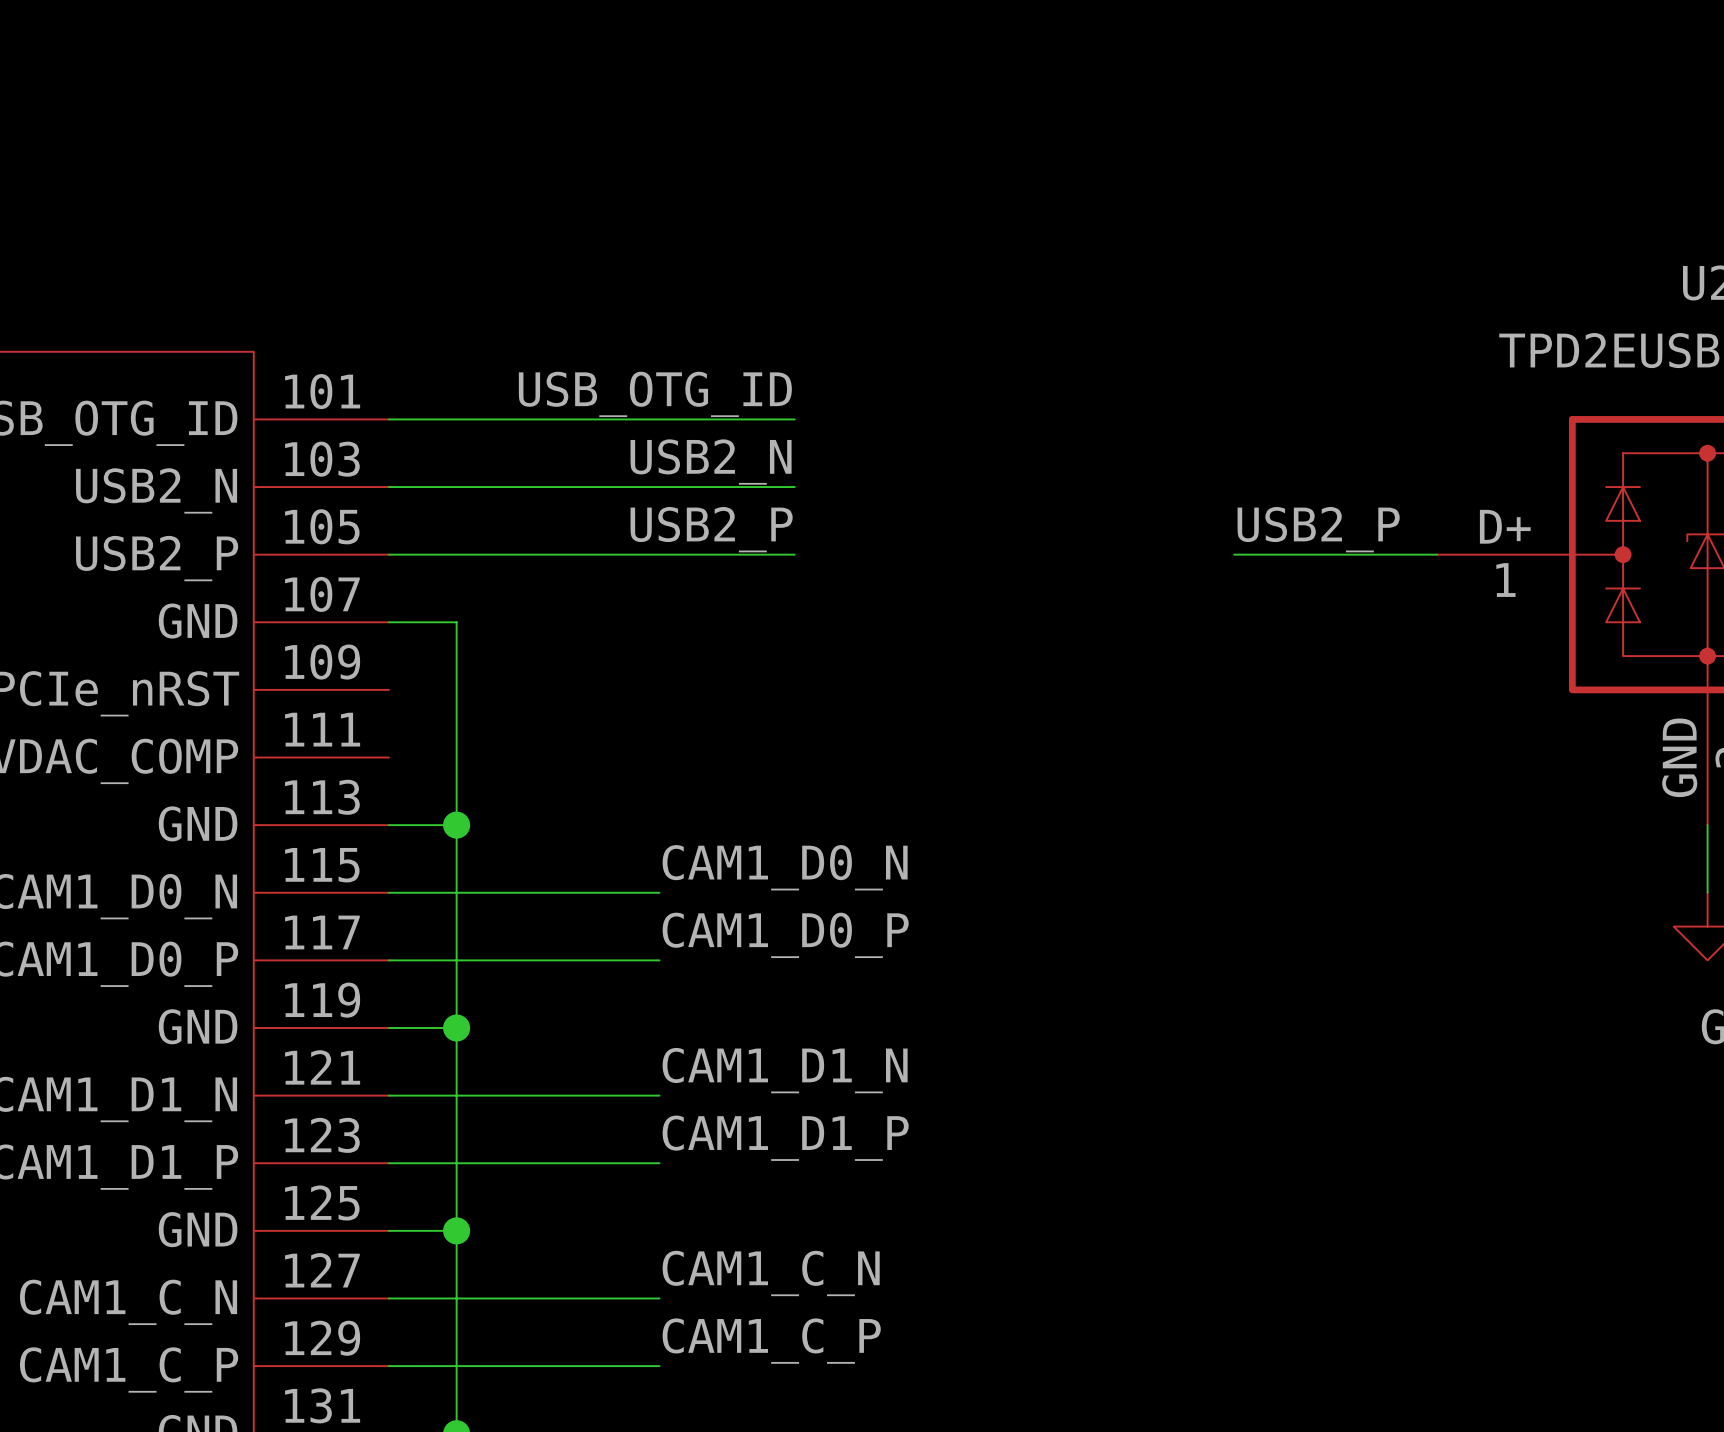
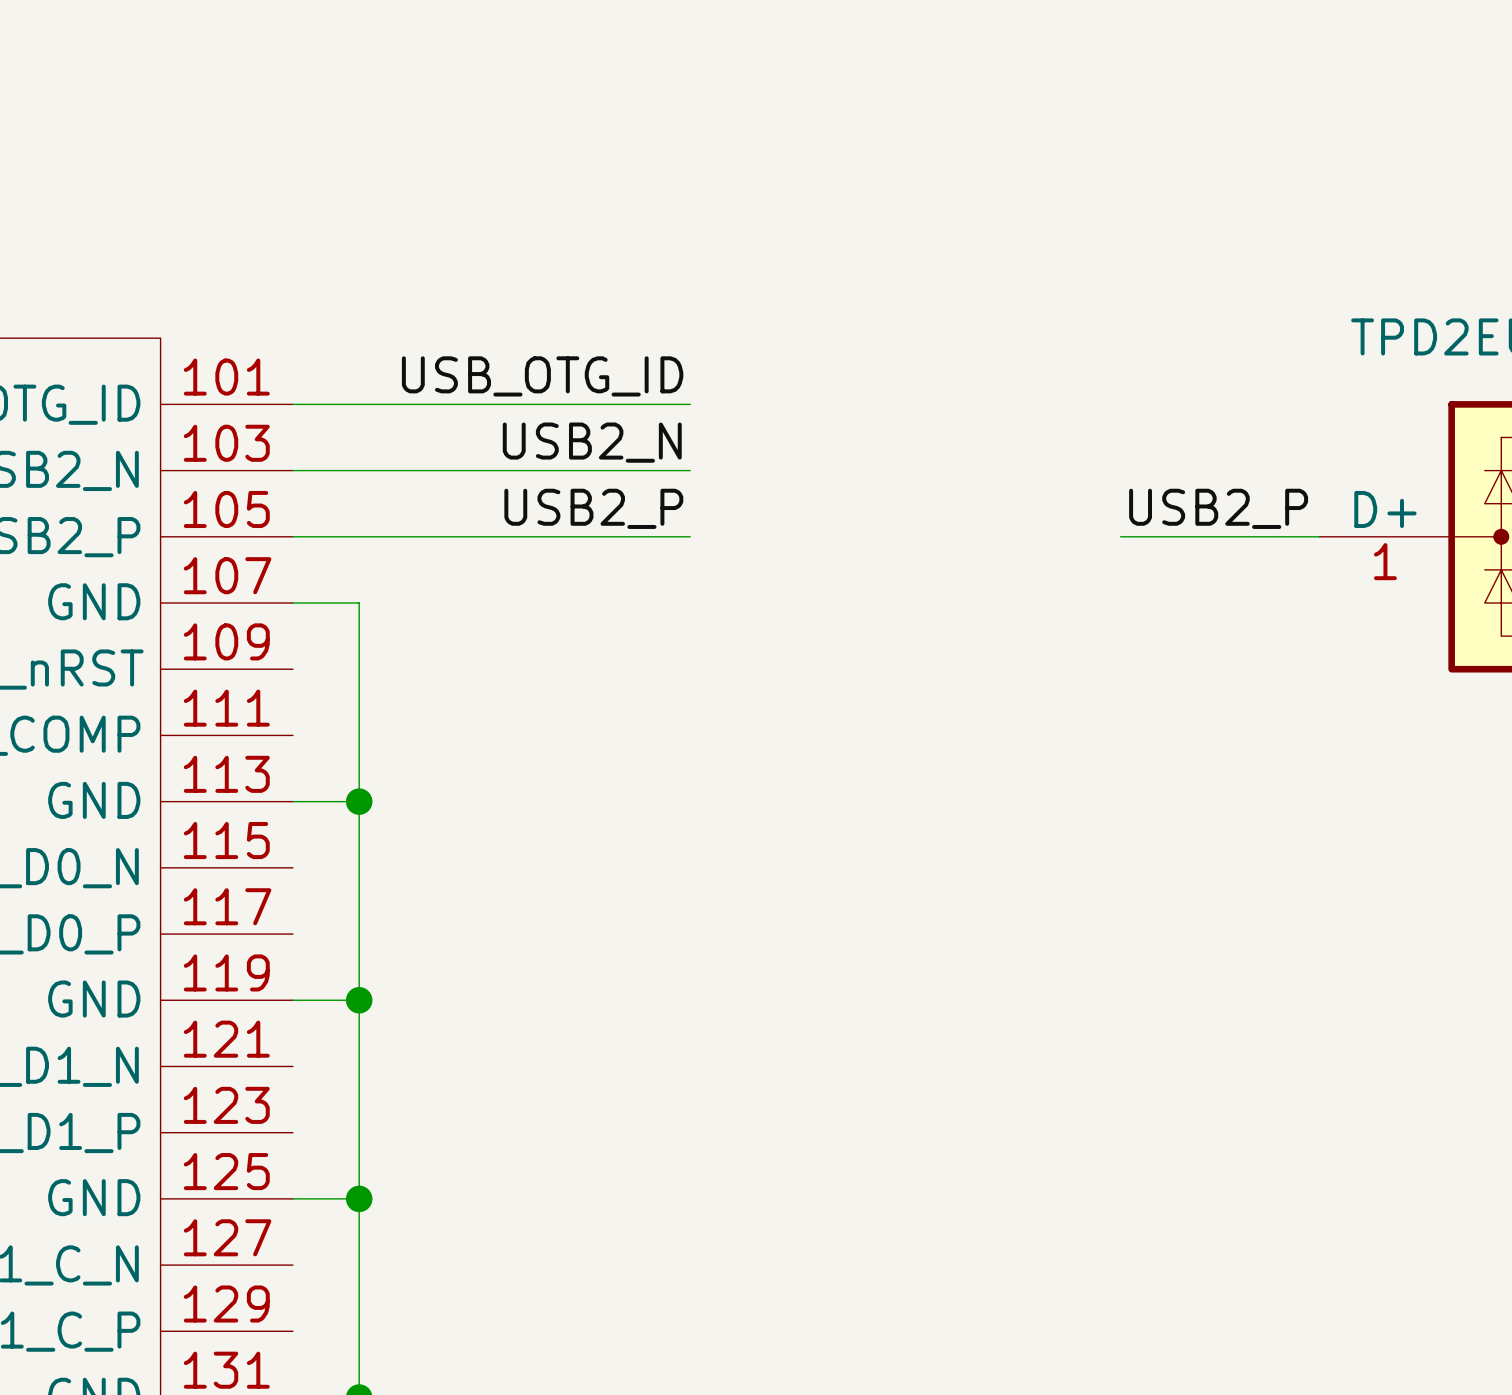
label: CAM1_D0_N (785, 867) -> none
wire: (389, 892) (659, 892) -> none
label: CAM1_D0_P (785, 935) -> none
wire: (389, 960) (659, 960) -> none
label: CAM1_D1_N (785, 1070) -> none
wire: (389, 1095) (659, 1095) -> none
label: CAM1_D1_P (785, 1138) -> none
wire: (389, 1163) (659, 1163) -> none
label: CAM1_C_N (771, 1273) -> none
wire: (389, 1298) (659, 1298) -> none
label: CAM1_C_P (771, 1341) -> none
wire: (389, 1366) (659, 1366) -> none

